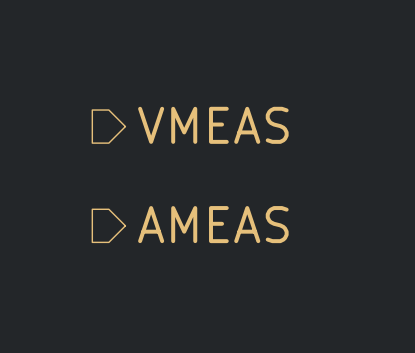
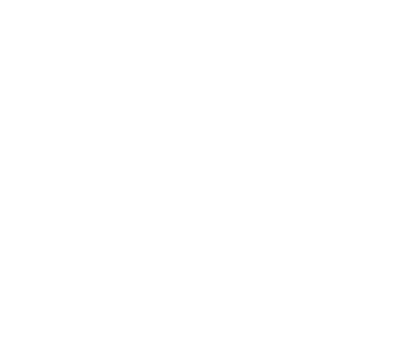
hierarchical label: VMEAS (213, 125) -> none
hierarchical label: AMEAS (213, 224) -> none

